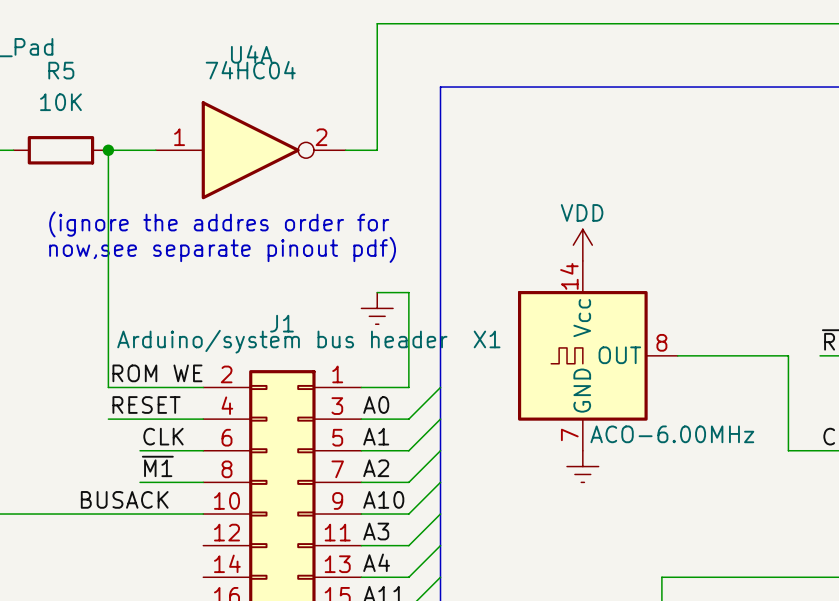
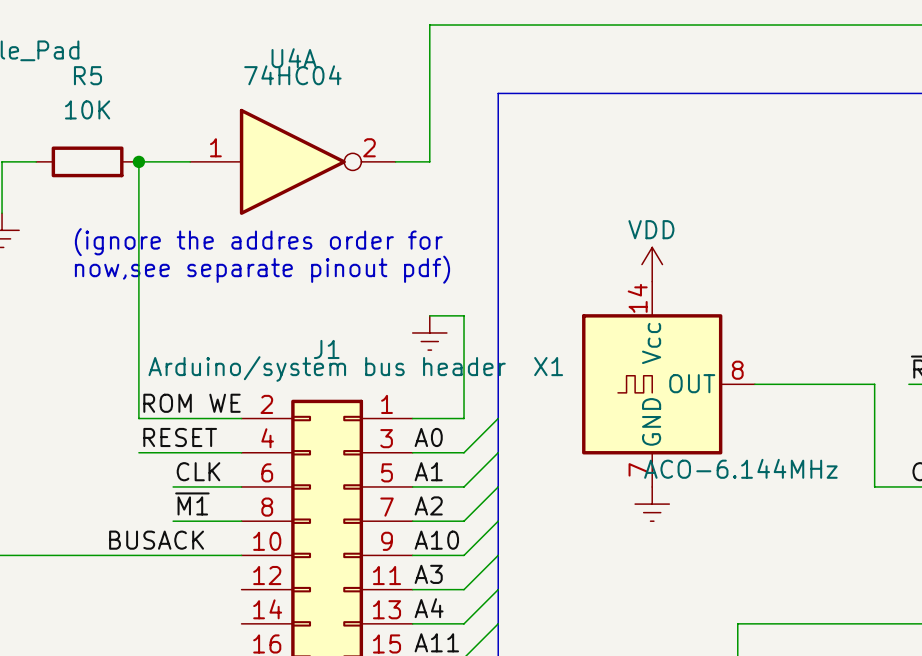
X1 value: ACO-6.00MHz (672, 434) -> ACO-6.144MHz (740, 468)

